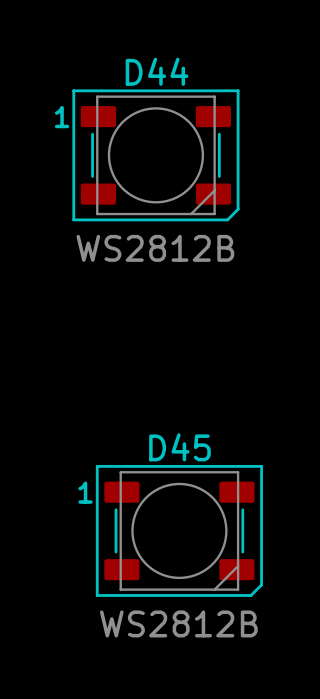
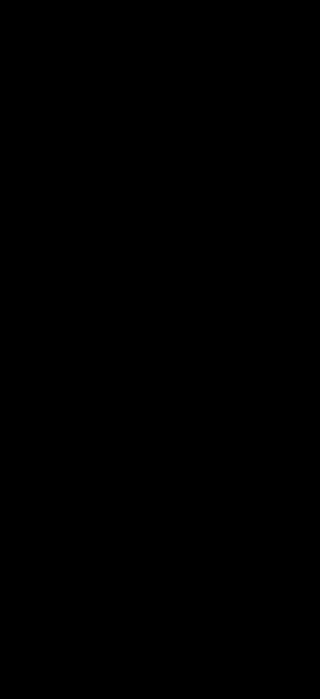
D44: WS2812B (155, 155) -> none
D45: WS2812B (179, 530) -> none

